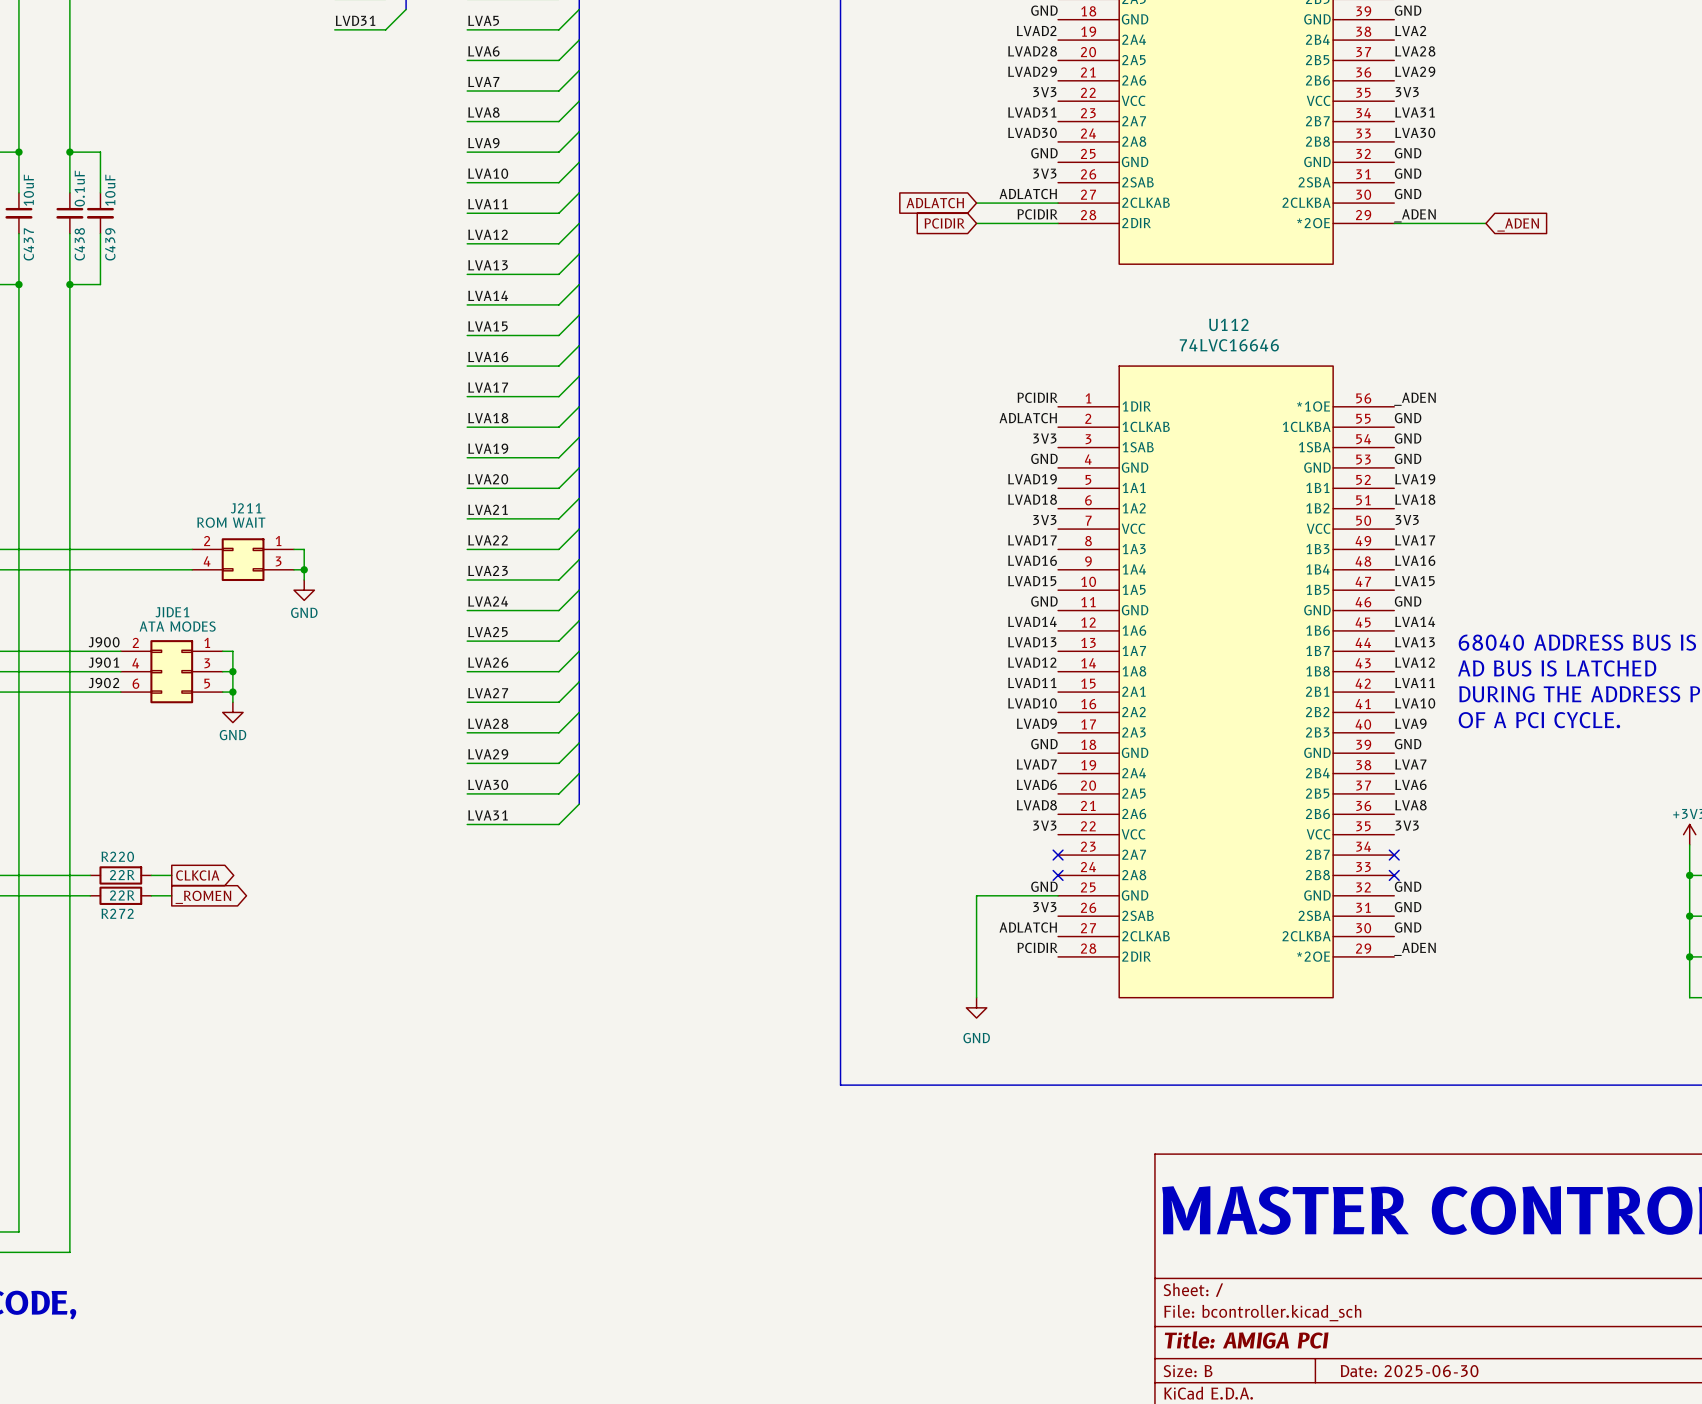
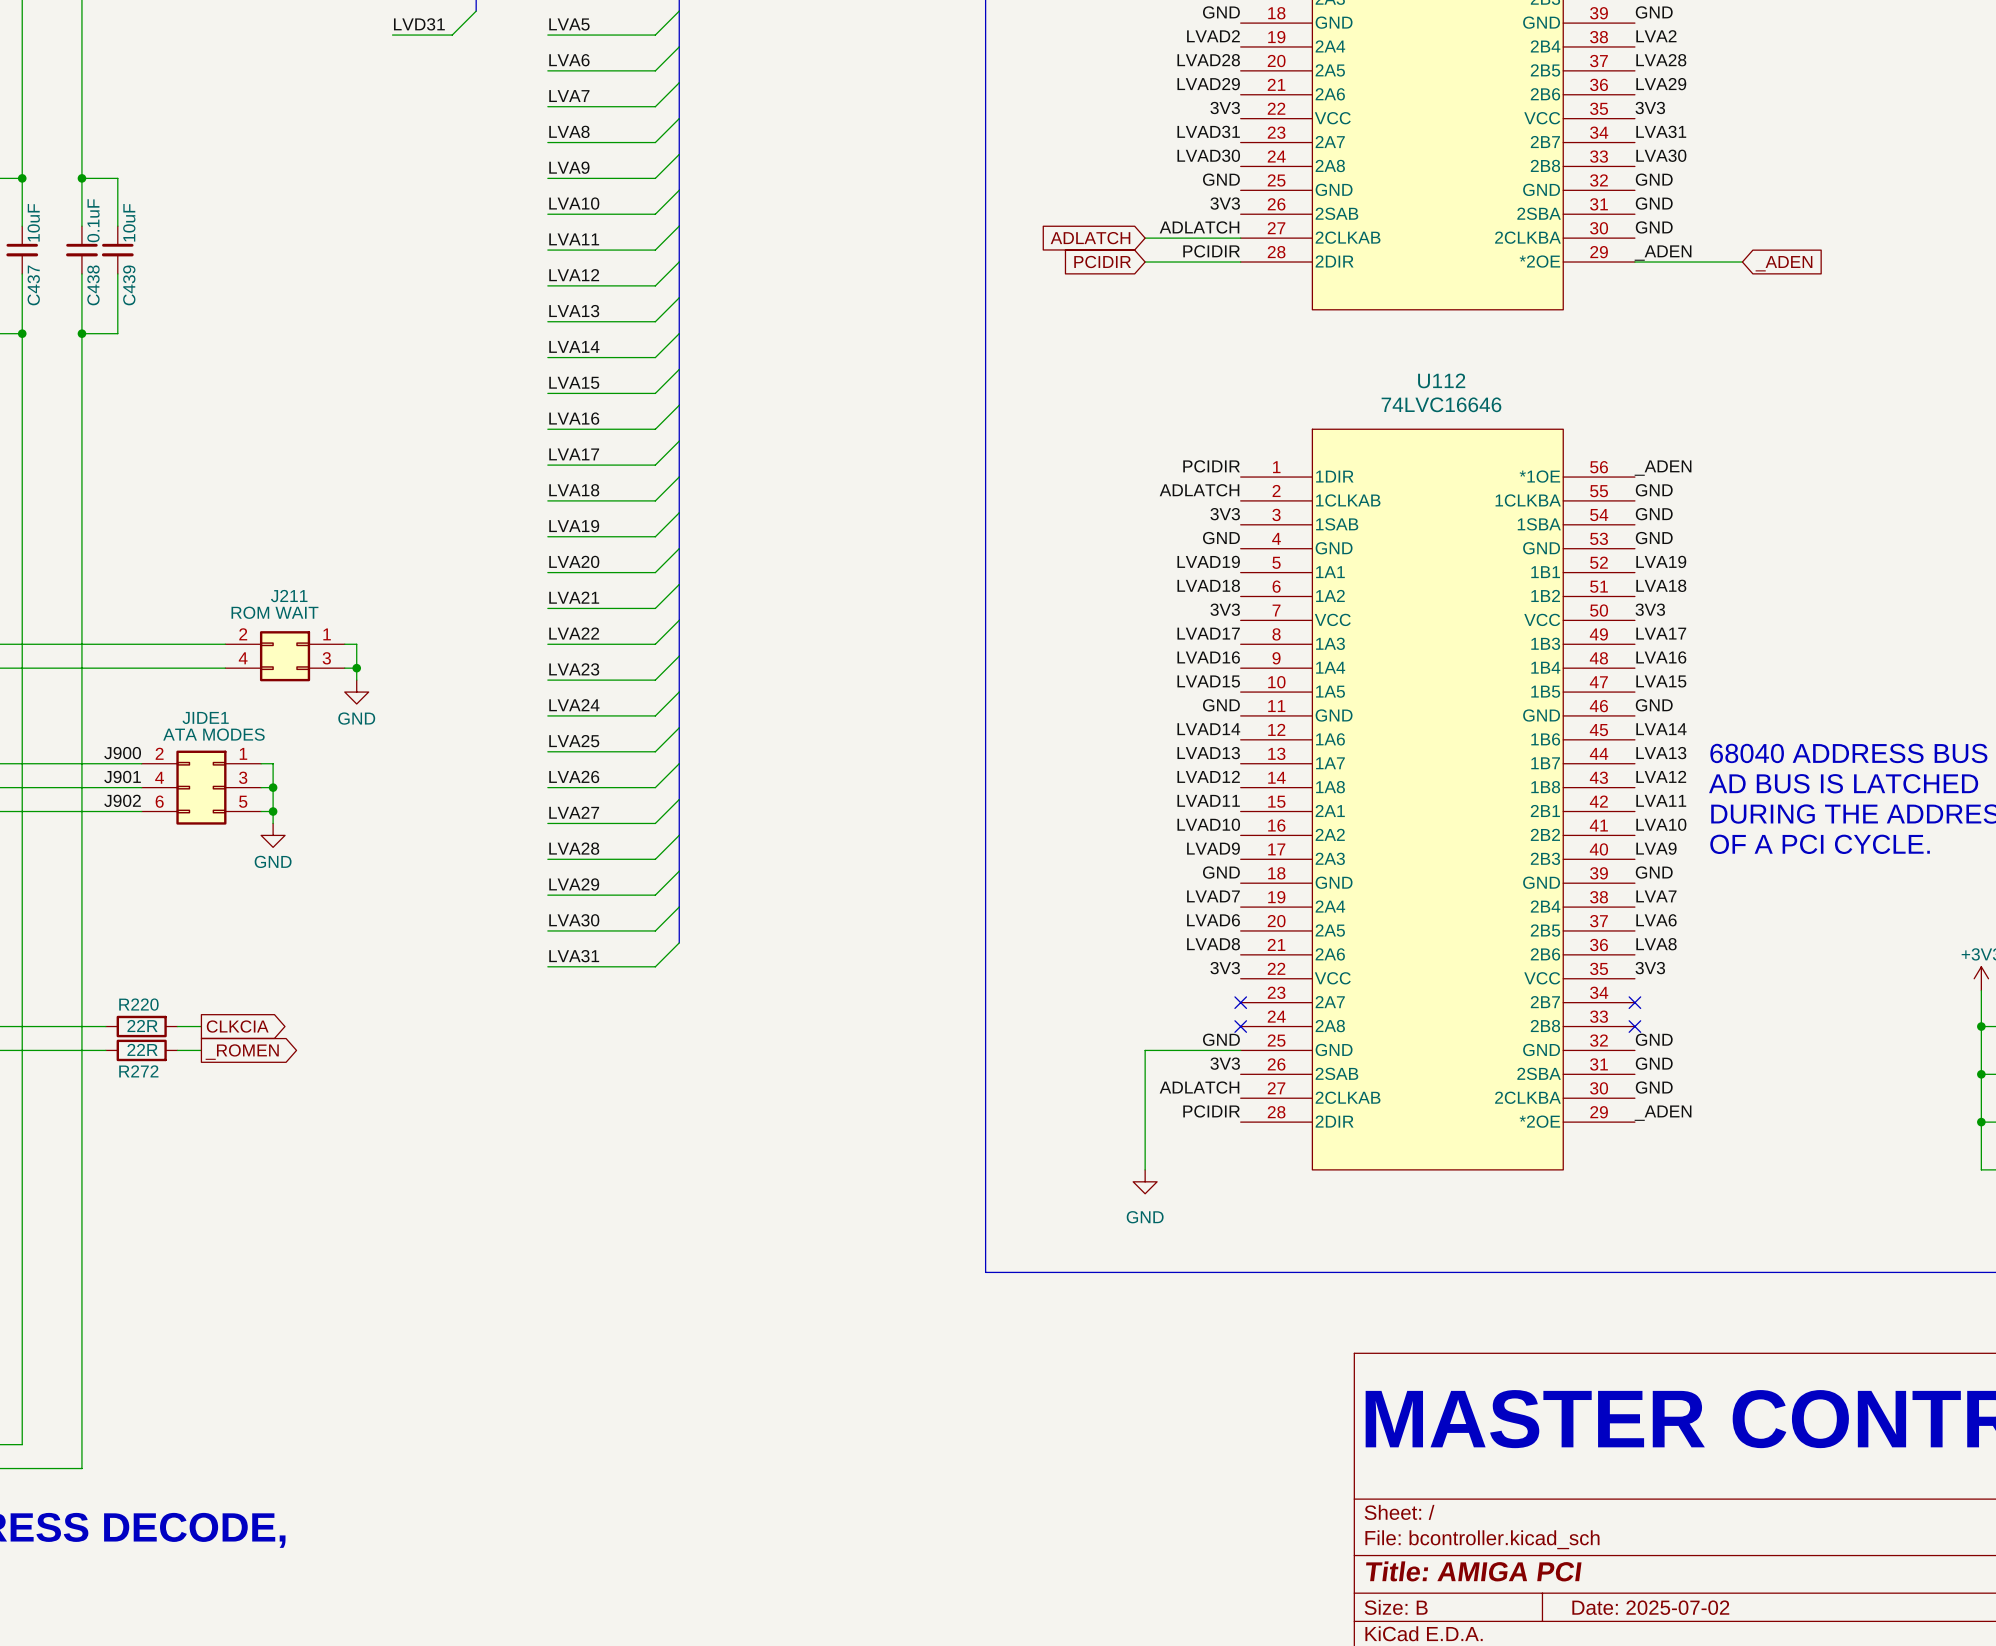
title block: Date: 2025-06-30 (1409, 1371) -> Date: 2025-07-02 (1650, 1607)

